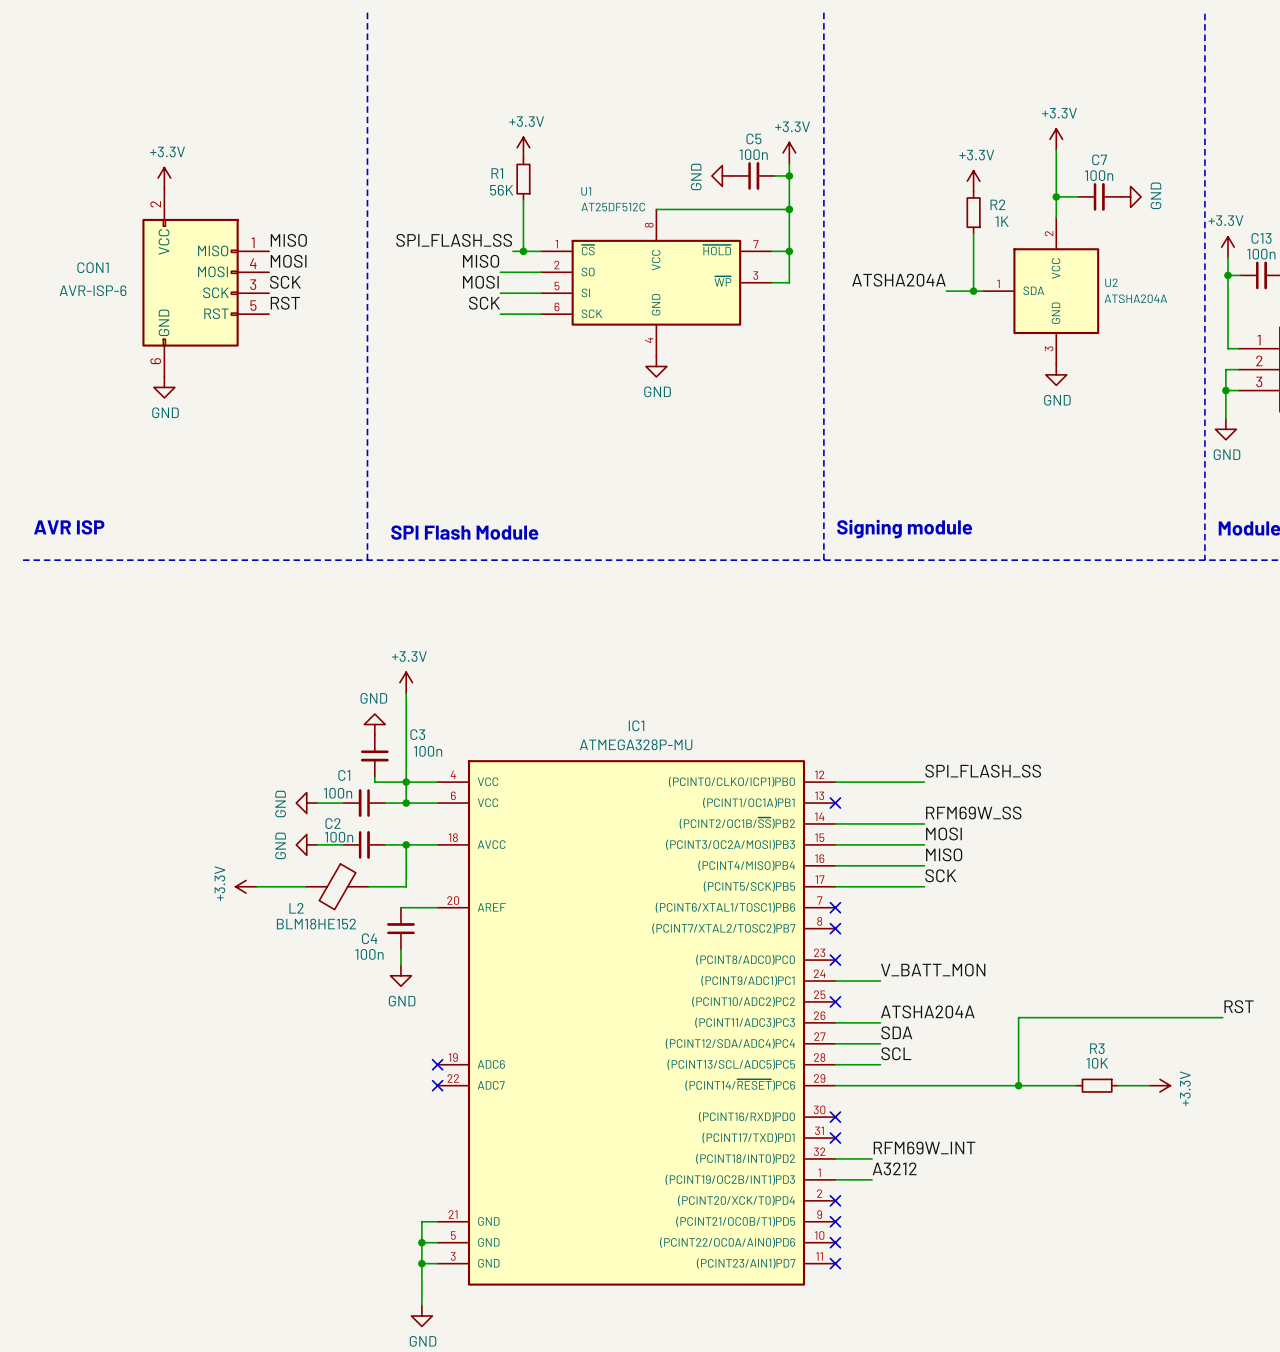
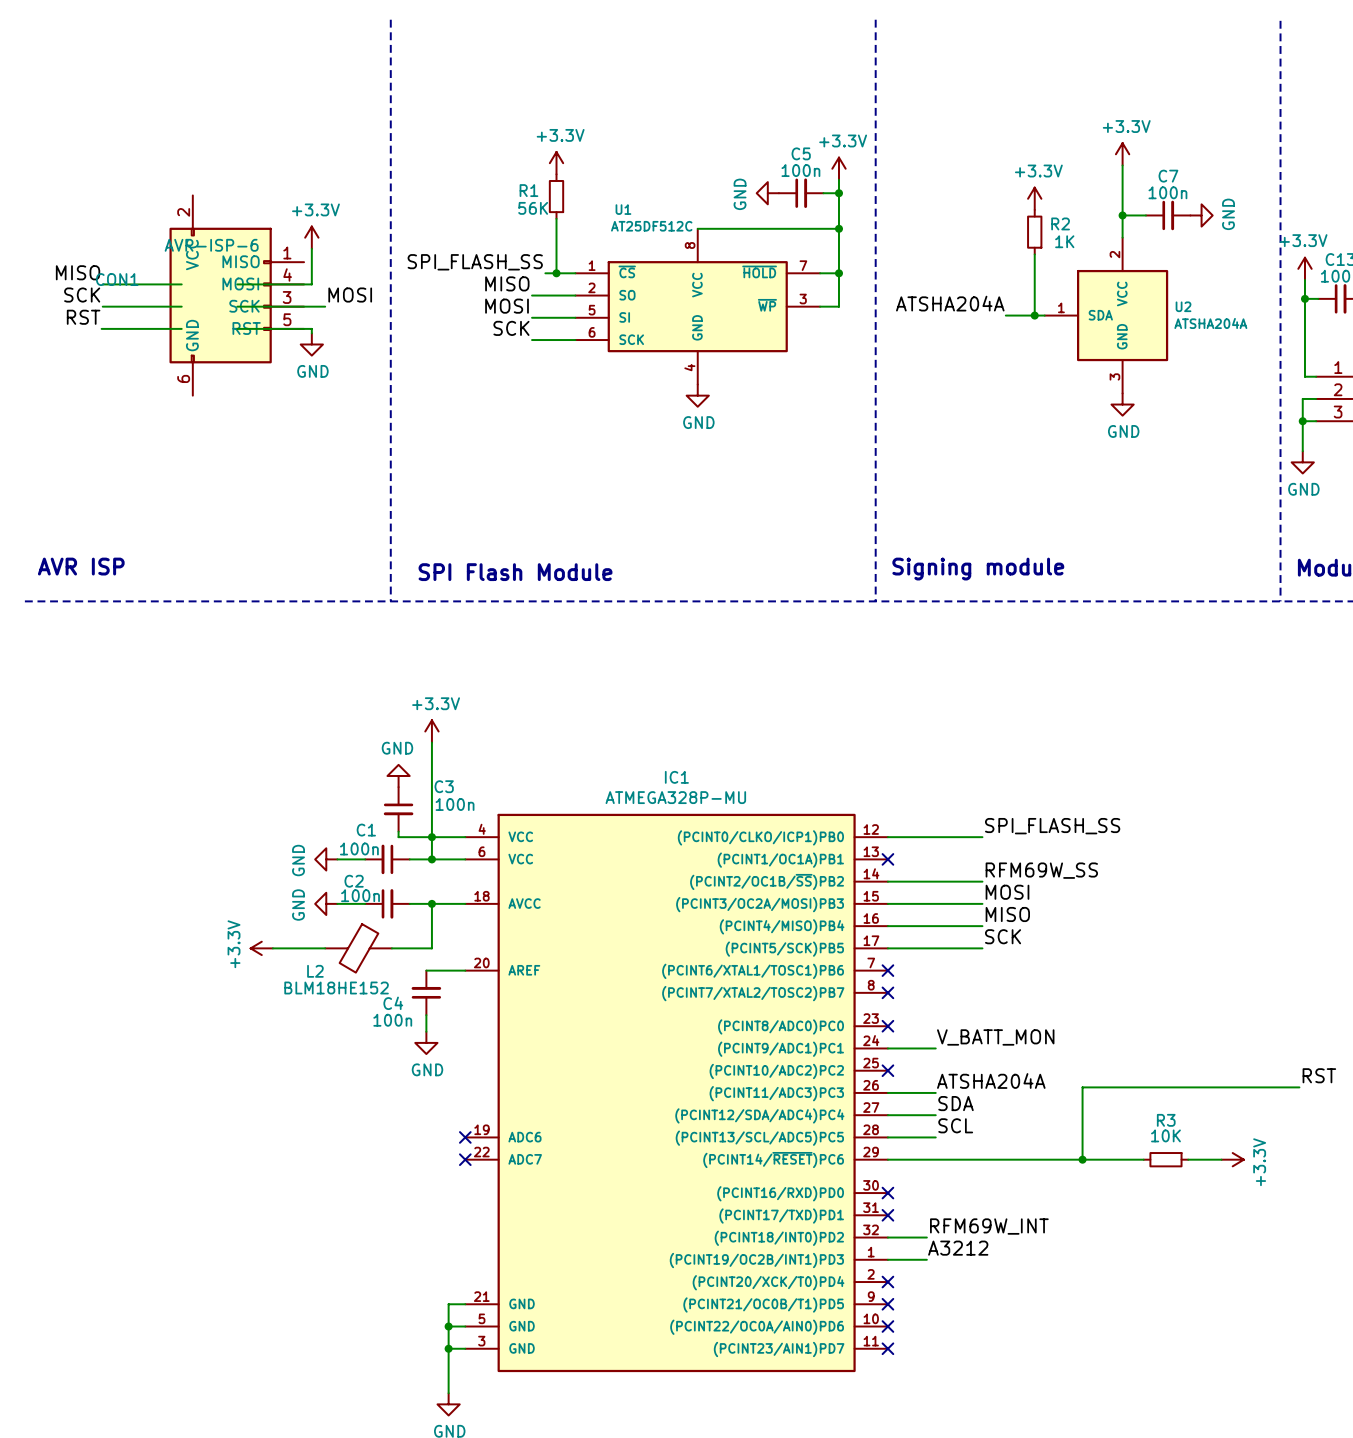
power symbol position: +3.3V (164, 178) -> +3.3V (311, 237)
wire: none -> (311, 248) (311, 284) (237, 284)
label position: MISO (288, 240) -> MISO (78, 272)
wire: none -> (102, 284) (181, 284)
label position: MOSI (288, 261) -> MOSI (350, 295)
wire: none -> (102, 306) (181, 306)
CON1 position: (205, 282) -> (236, 295)
wire: none -> (237, 306) (325, 306)
label position: SCK (285, 282) -> SCK (82, 295)
CON1 value position: AVR-ISP-6 (93, 290) -> AVR-ISP-6 (211, 245)
wire: none -> (101, 328) (181, 328)
wire: none -> (237, 328) (311, 328) (311, 333)
label position: RST (285, 303) -> RST (83, 317)
power symbol position: GND (164, 387) -> GND (311, 344)

